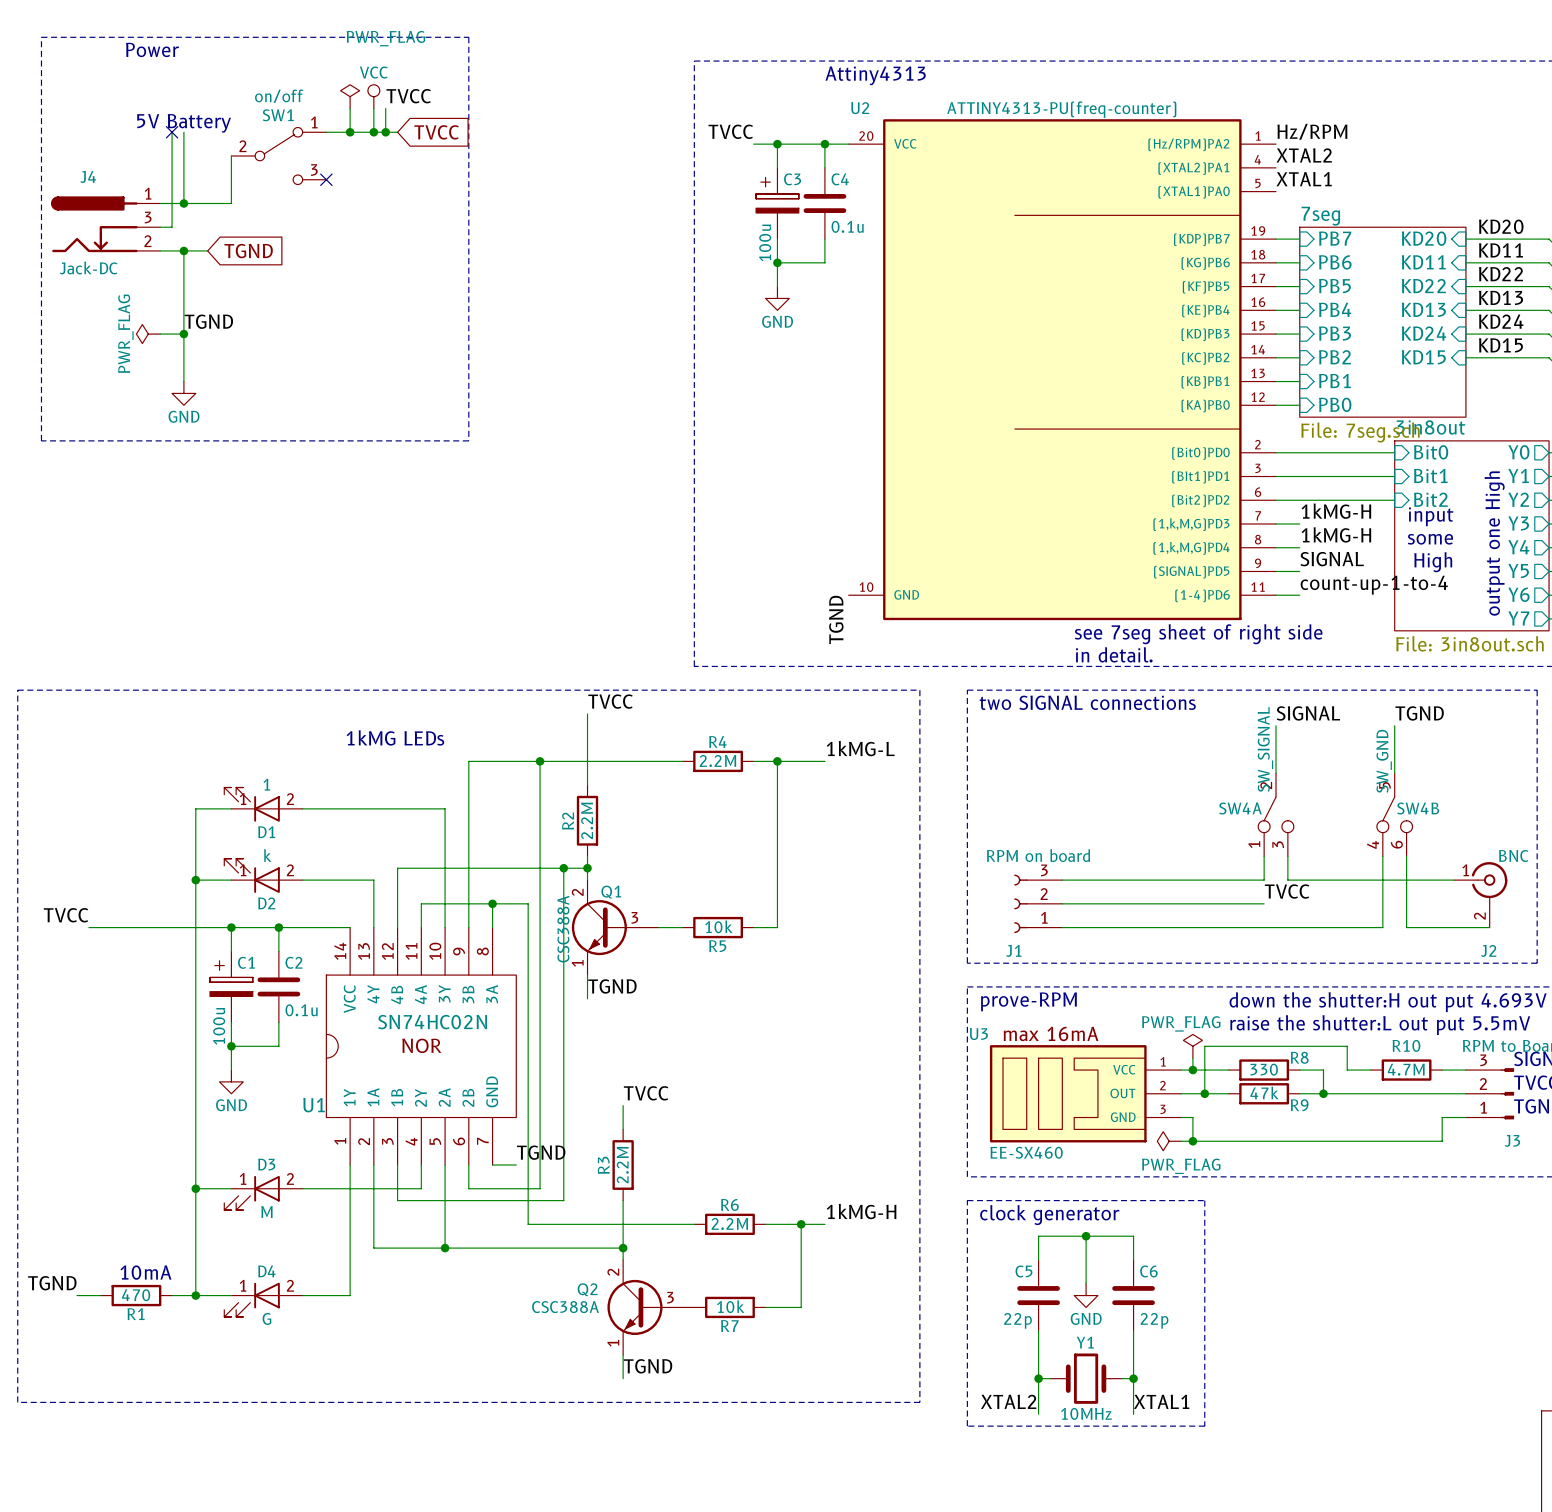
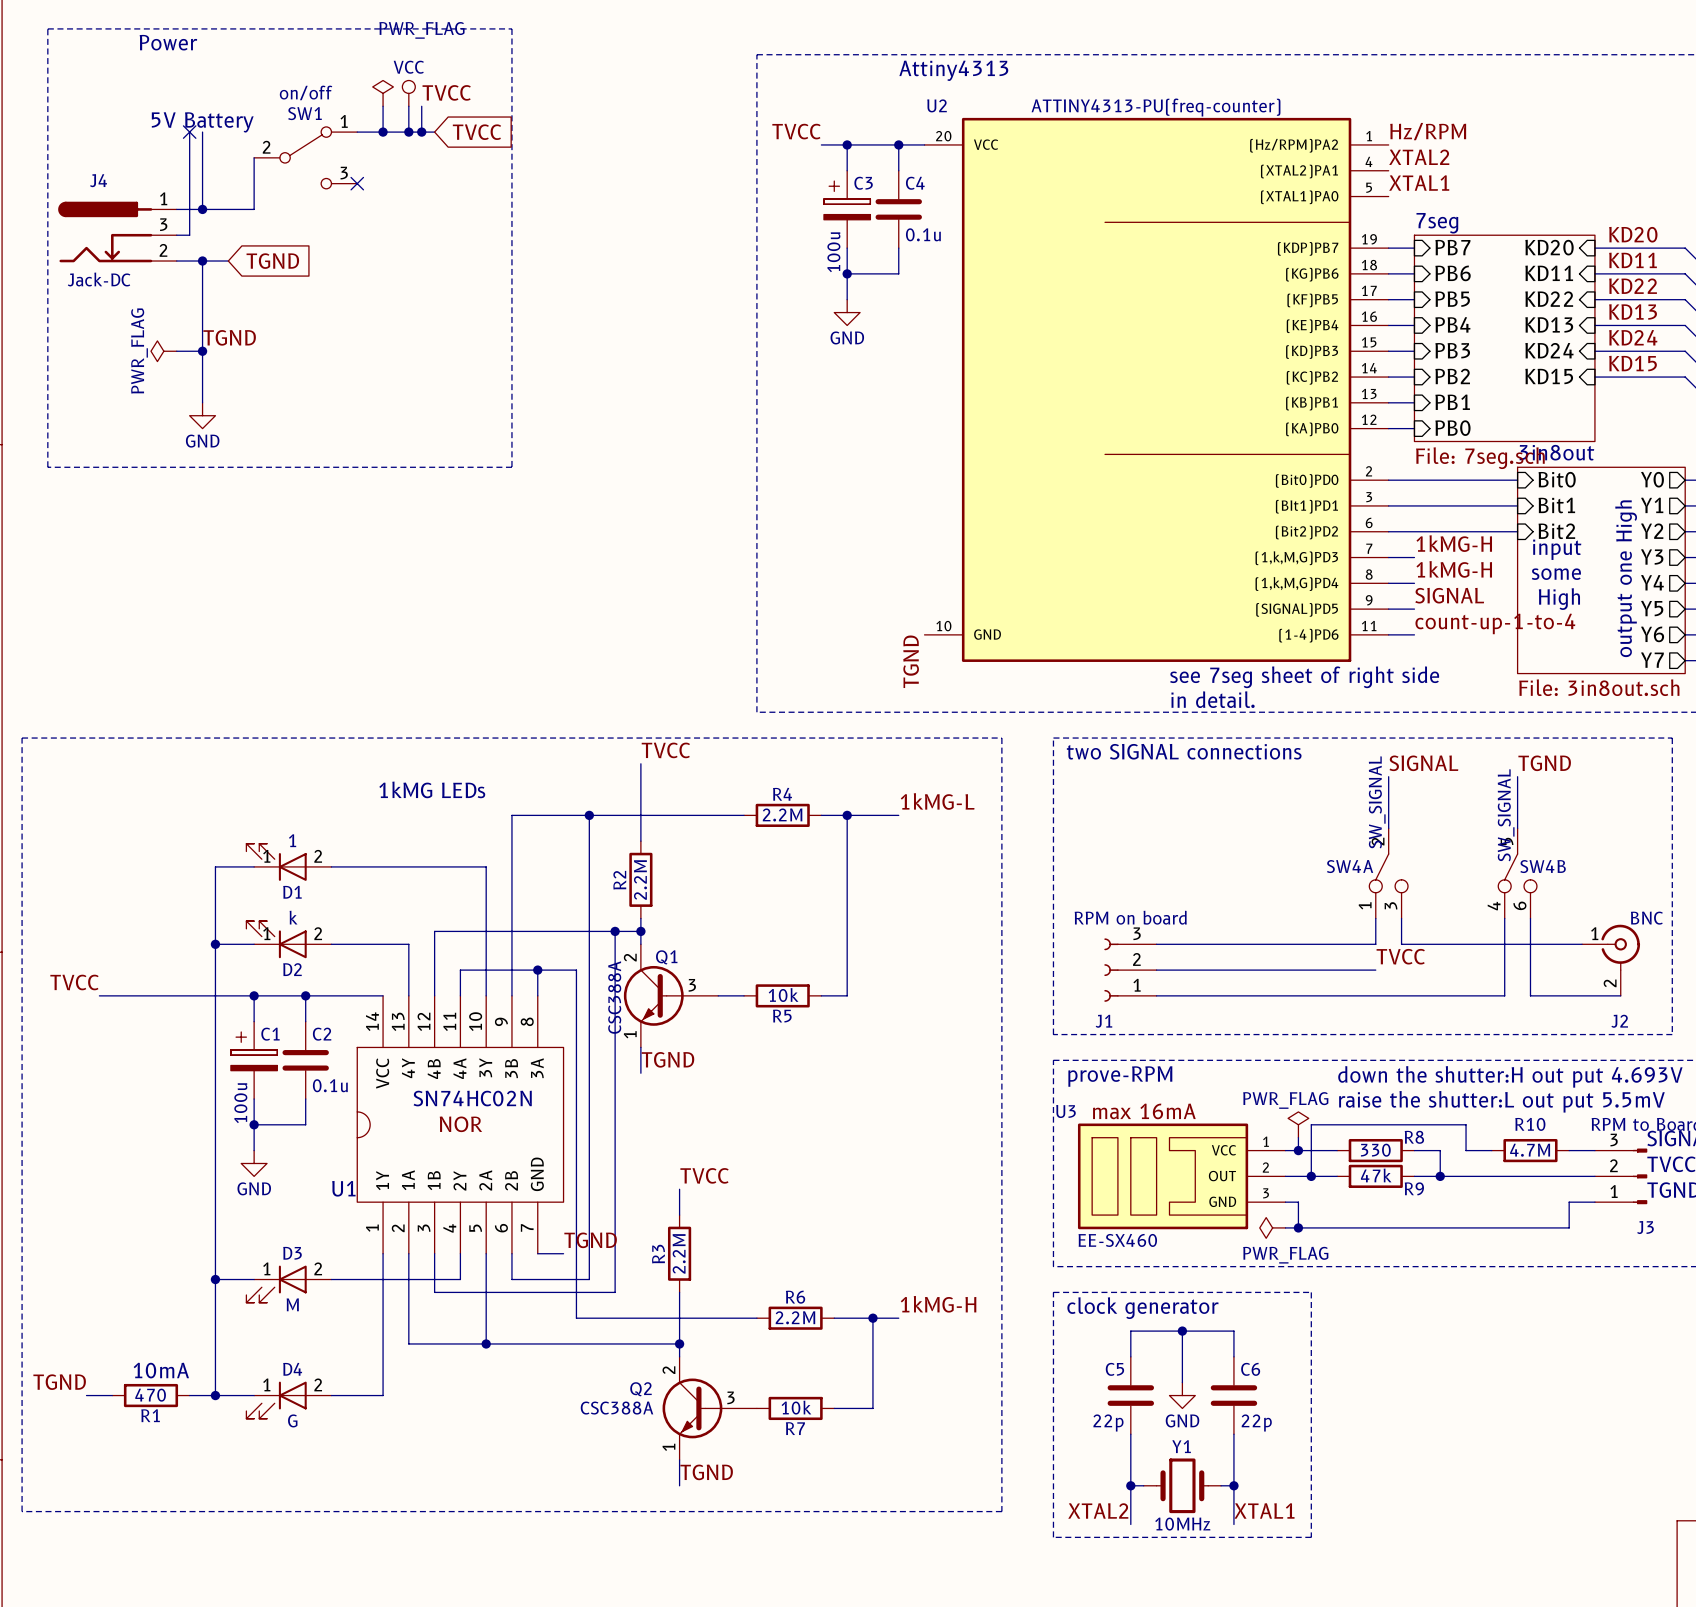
SW4B value: SW_GND (1384, 761) -> SW_SIGNAL (1506, 815)

